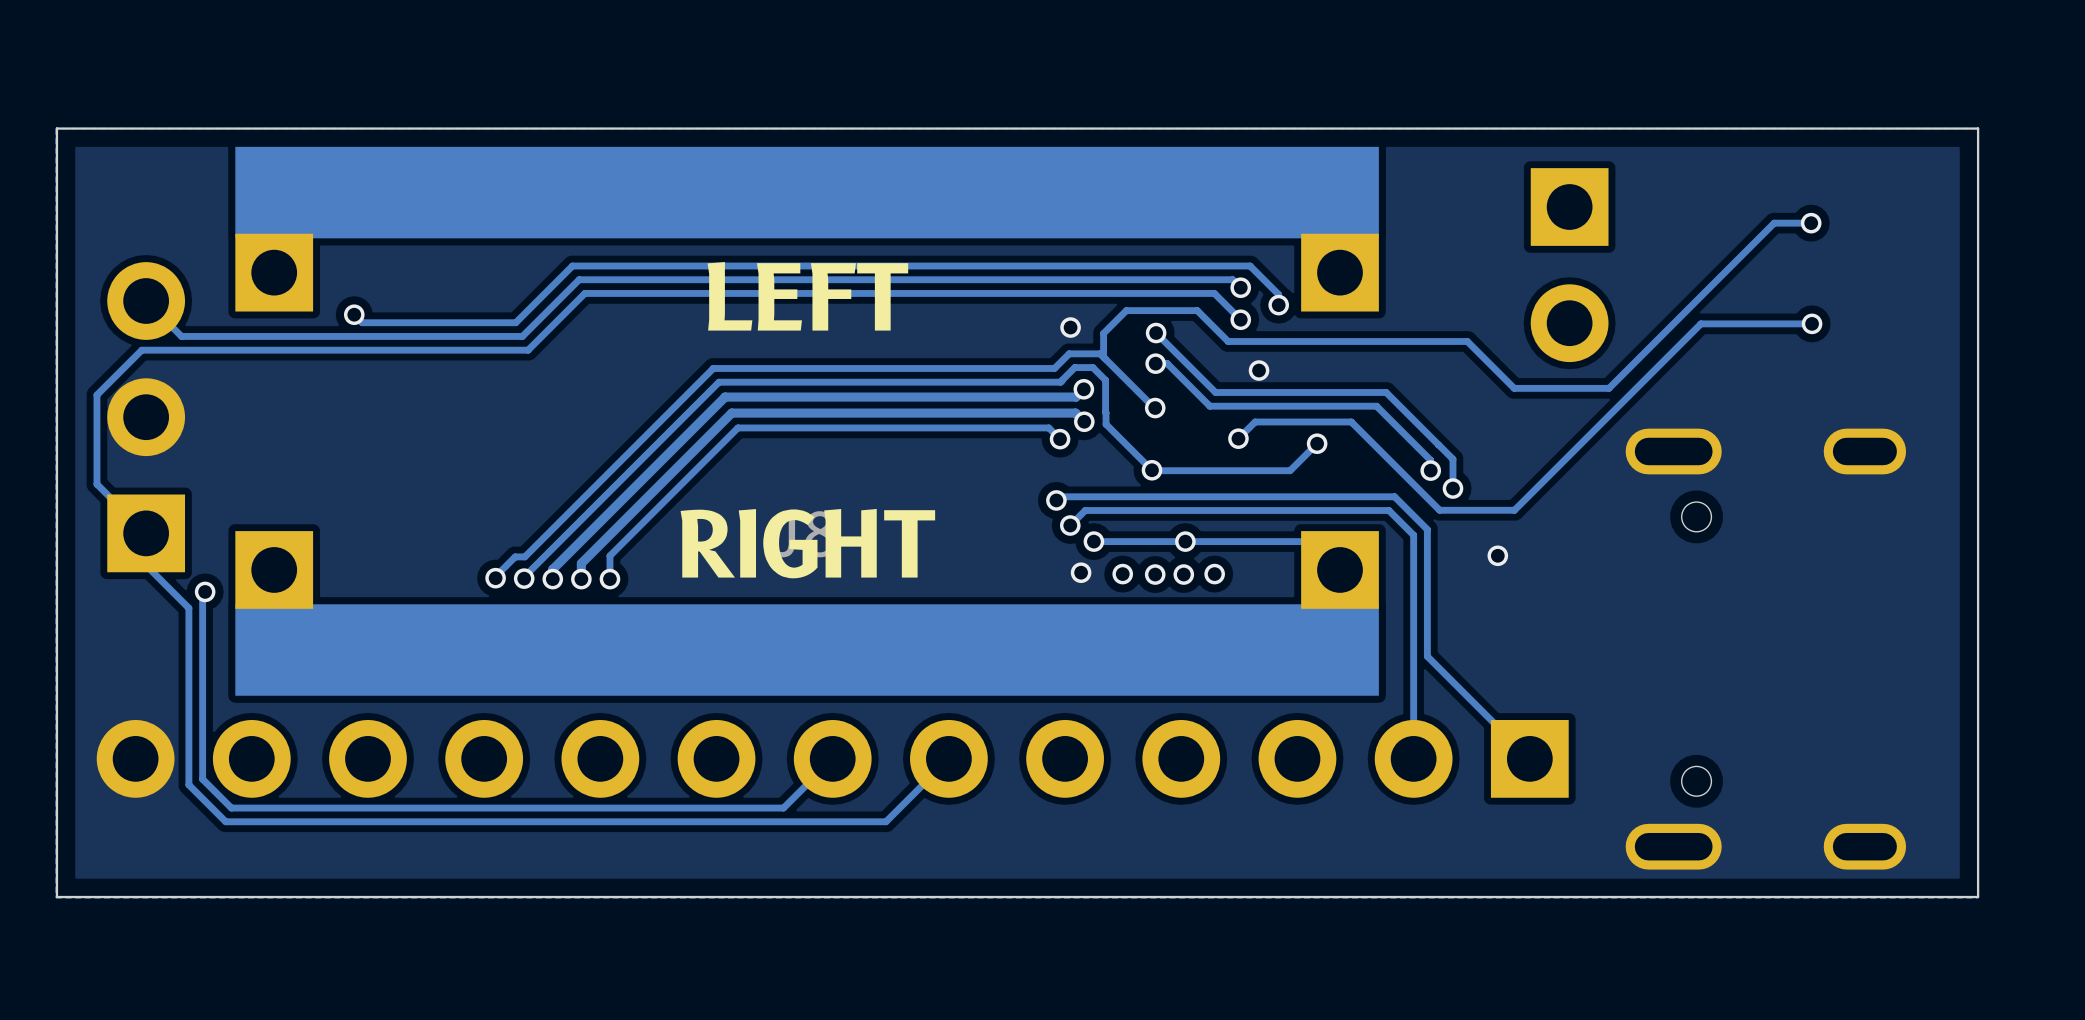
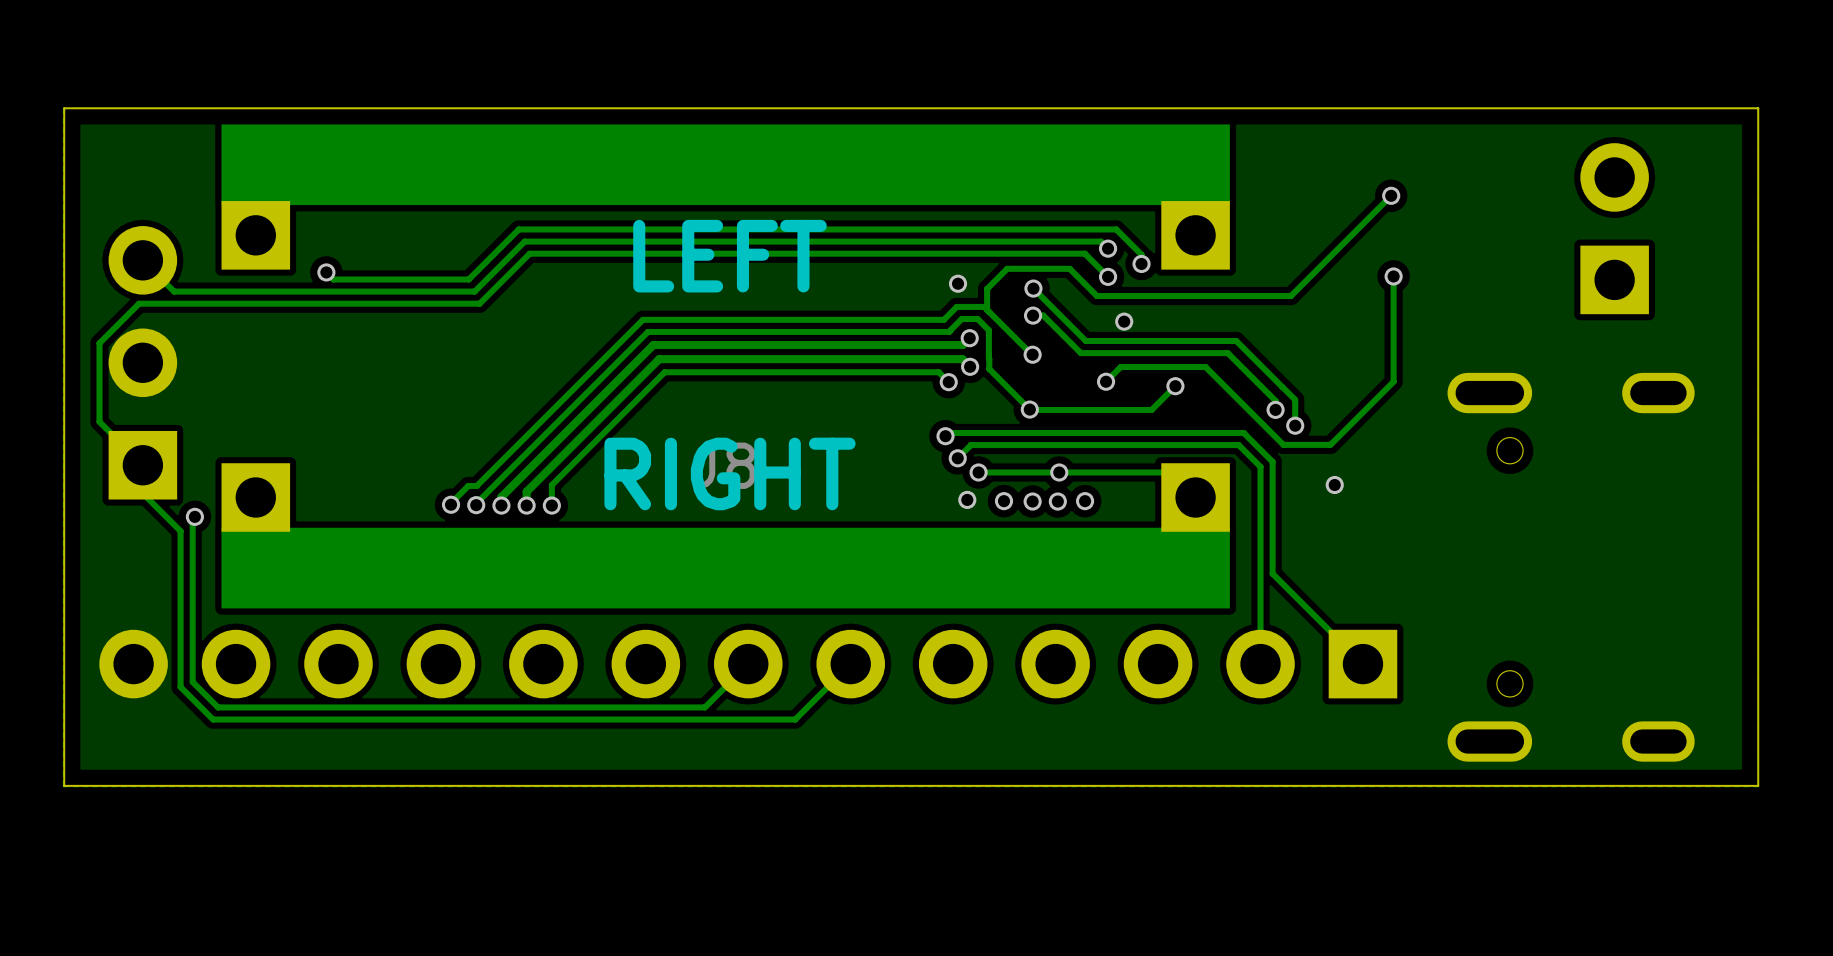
track: (1811, 223) (1774, 223) (1608, 388) (1514, 388) (1467, 341) (1448, 341) -> (1391, 195) (1290, 296)
via: (1811, 223) -> none
via: none -> (1391, 195)
part rotation: 0° (1569, 265) -> 180° (1614, 228)
part position: (1569, 265) -> (1614, 228)
via: none -> (1393, 276)
track: (1812, 323) (1700, 323) (1514, 510) (1493, 510) -> (1393, 276) (1393, 381) (1330, 444)
via: (1812, 323) -> none

